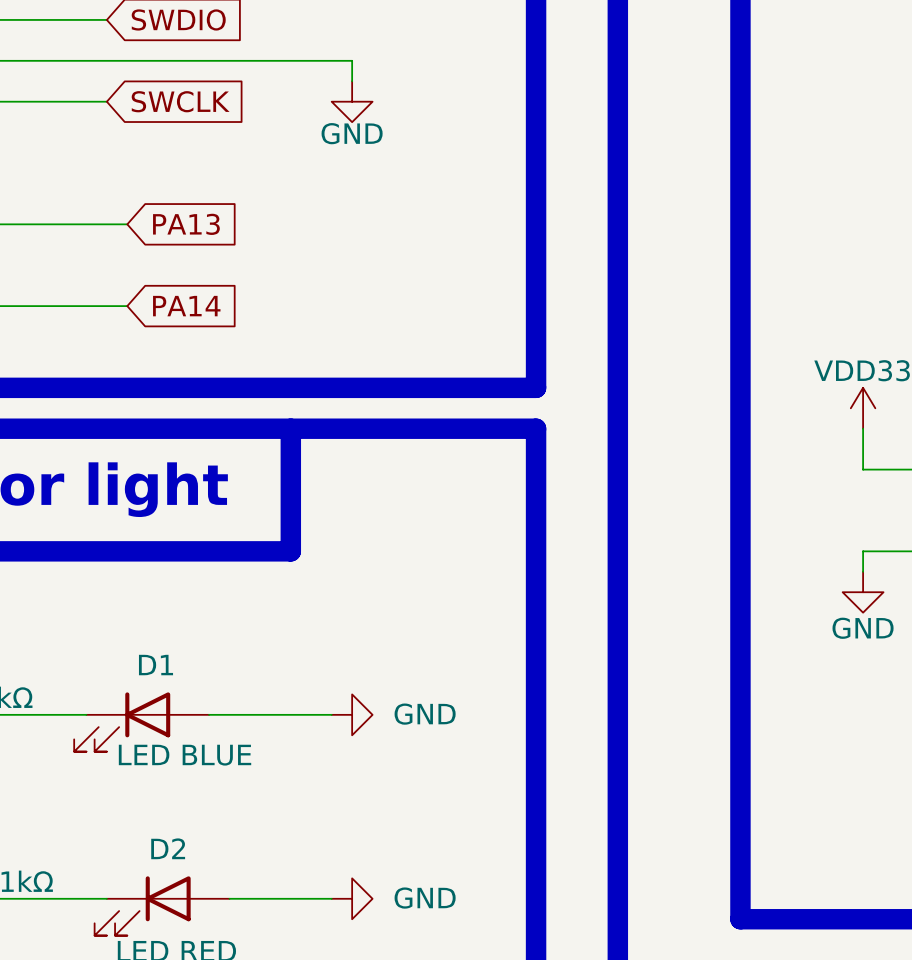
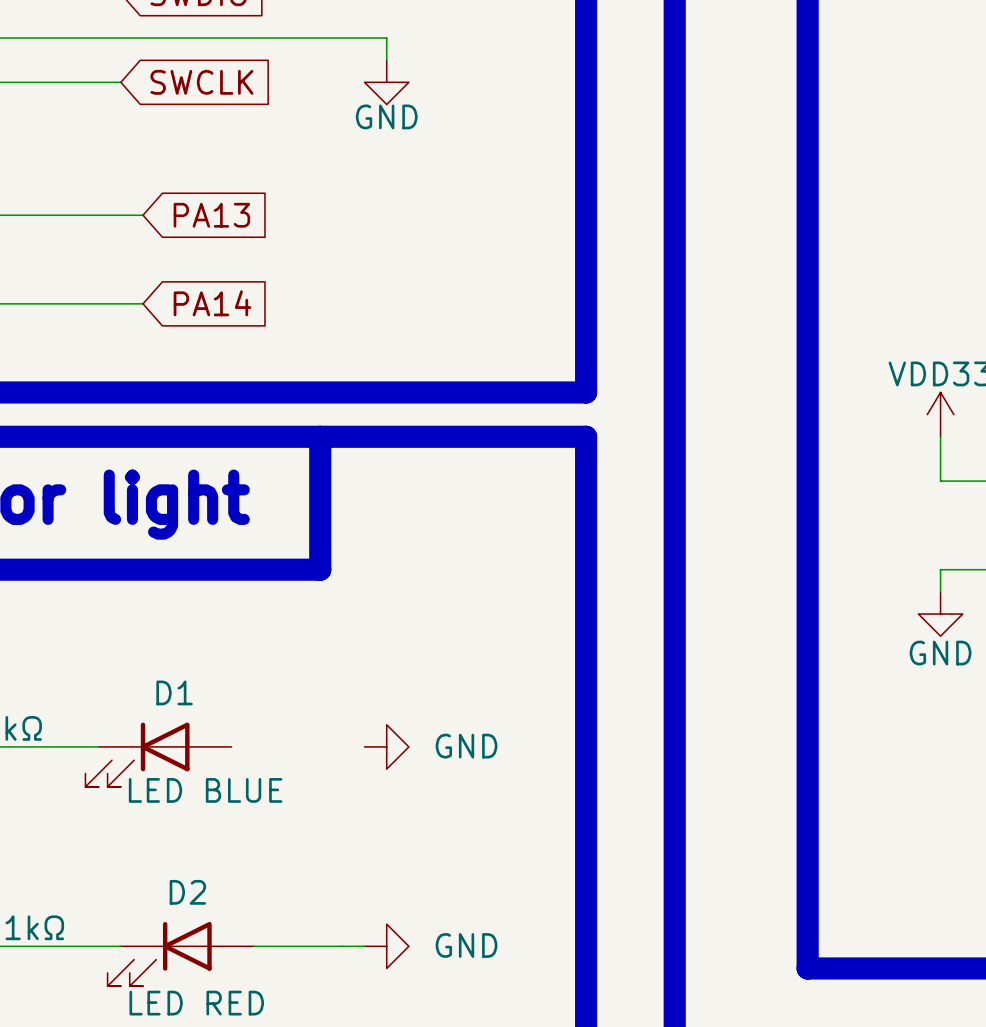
wire: (209, 714) (331, 714) -> none

